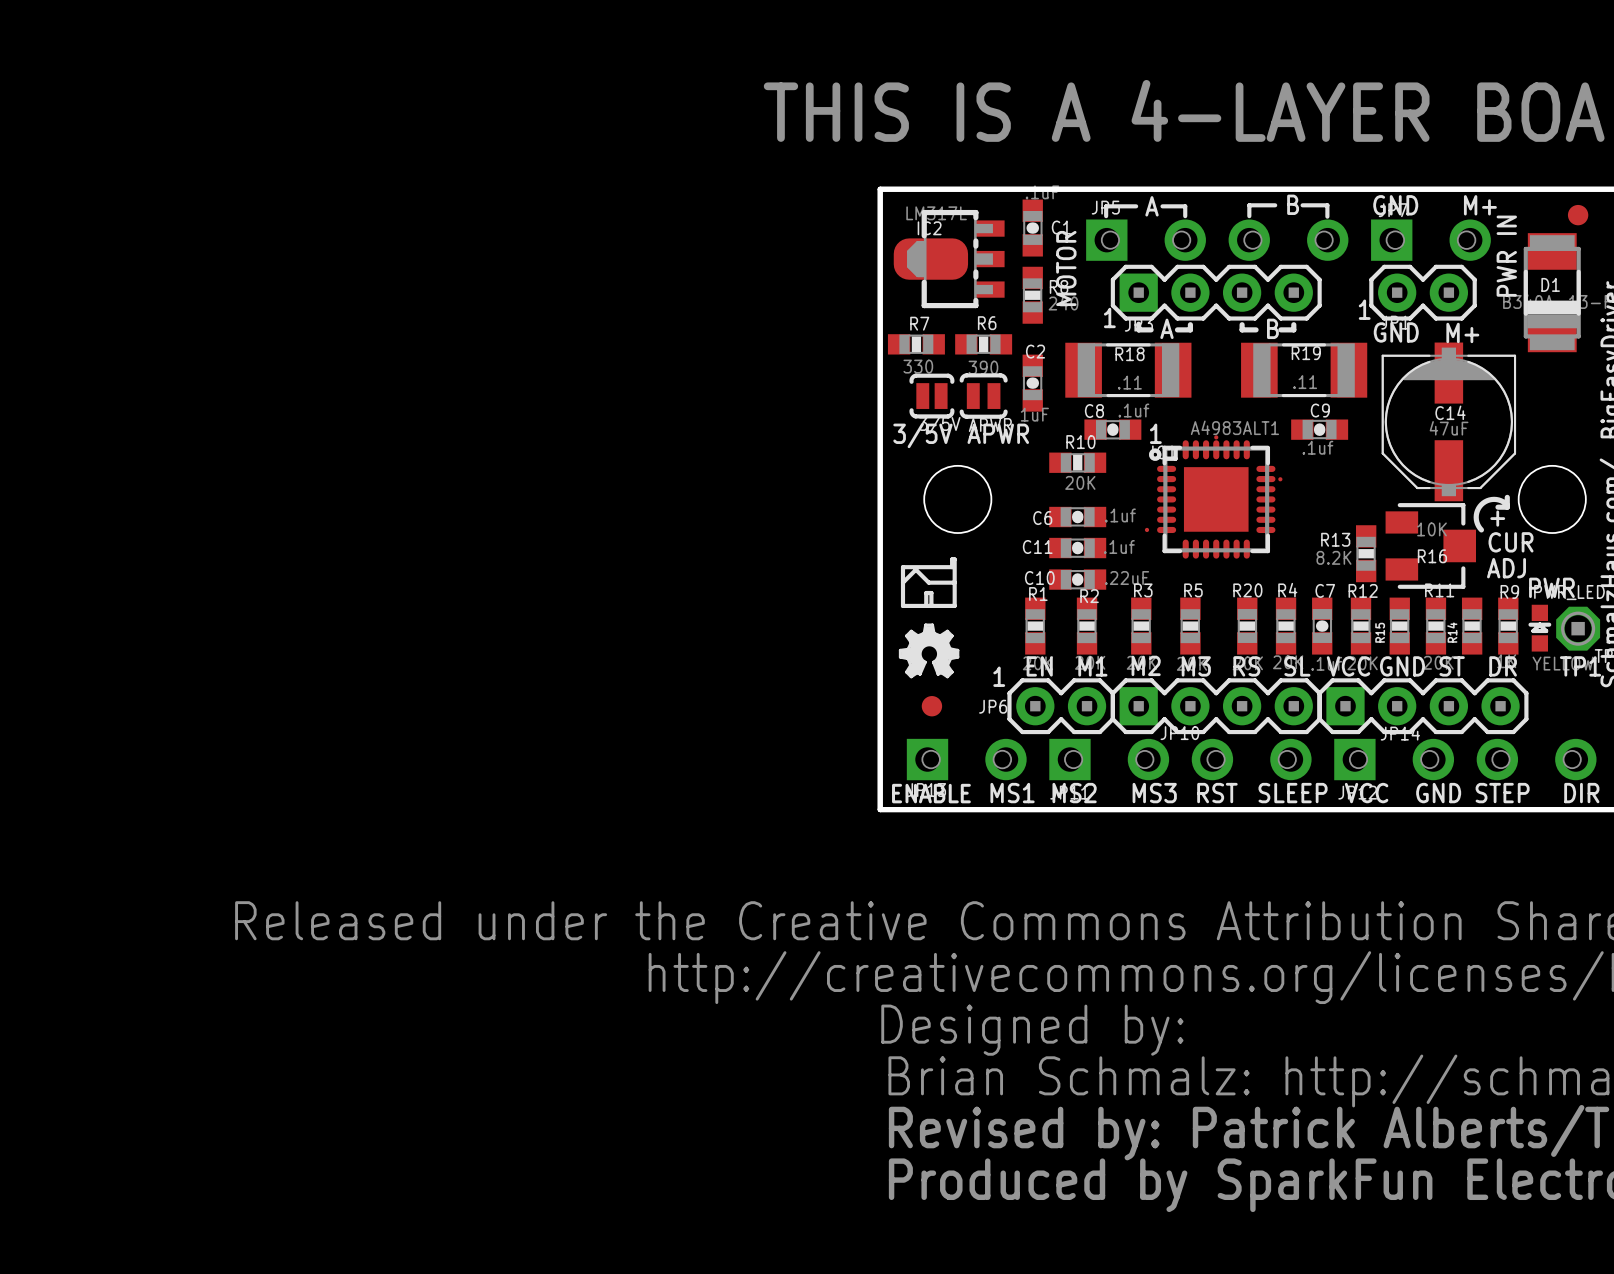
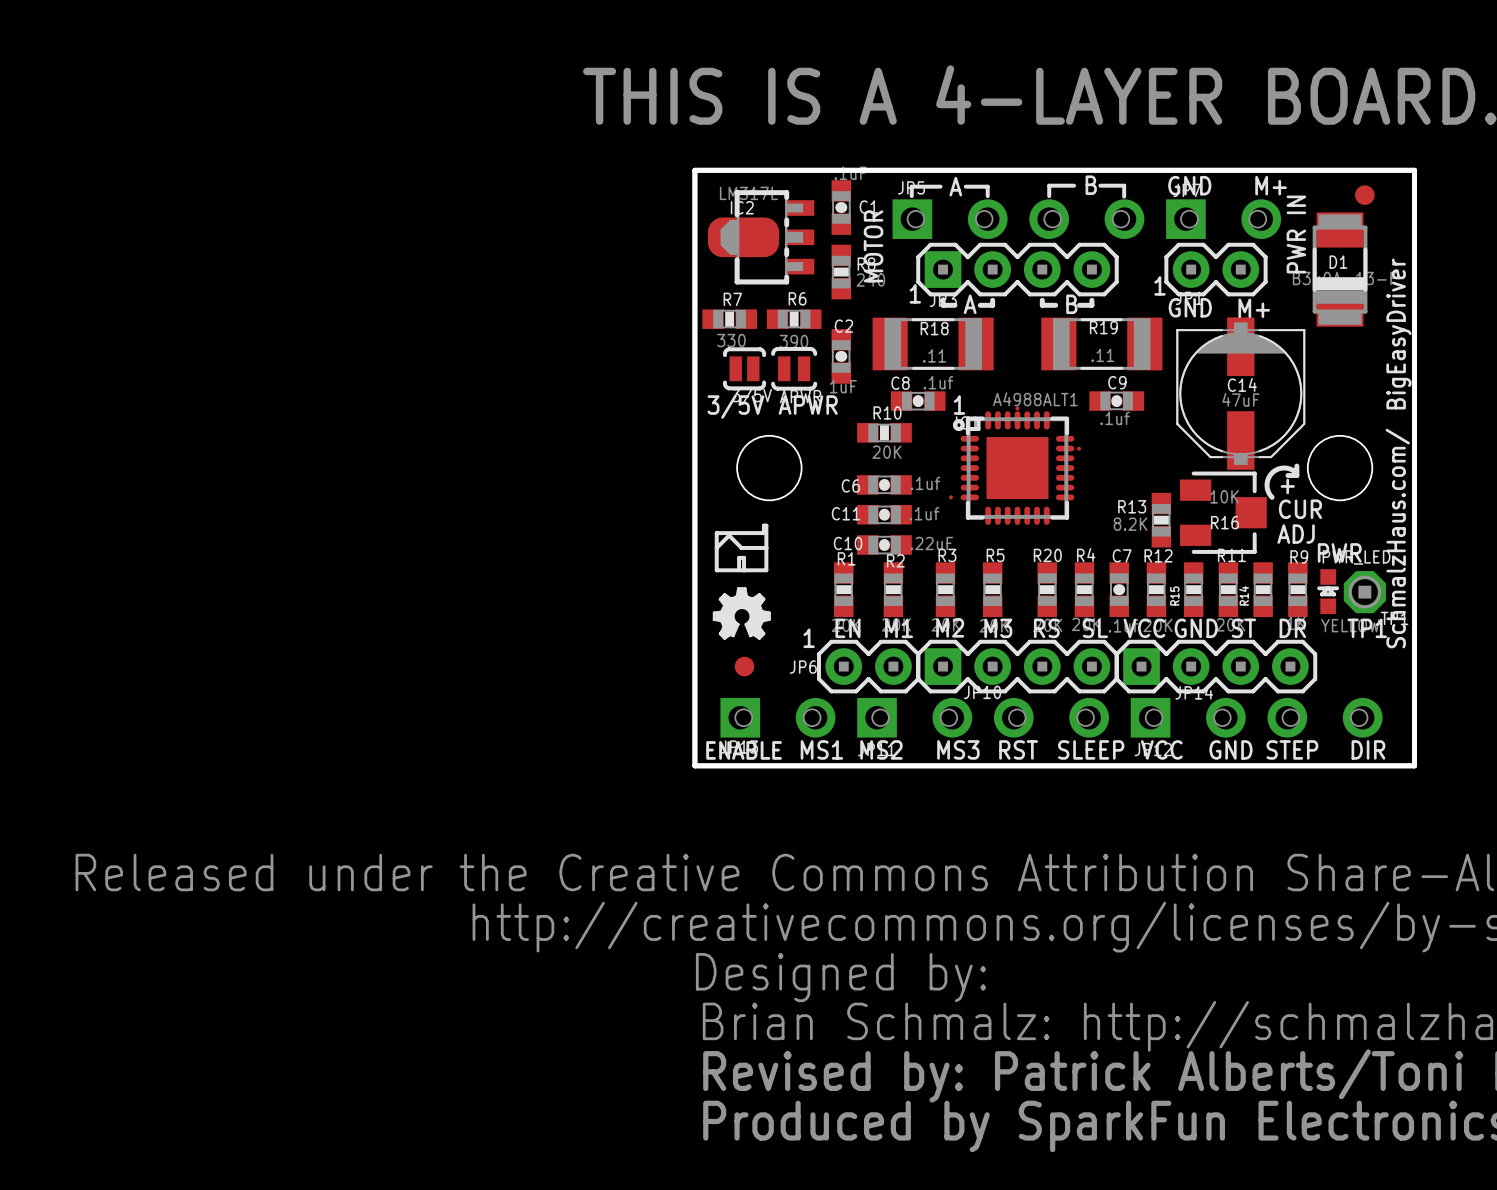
part value: A4983ALT1 (1234, 427) -> A4988ALT1 (1035, 399)

